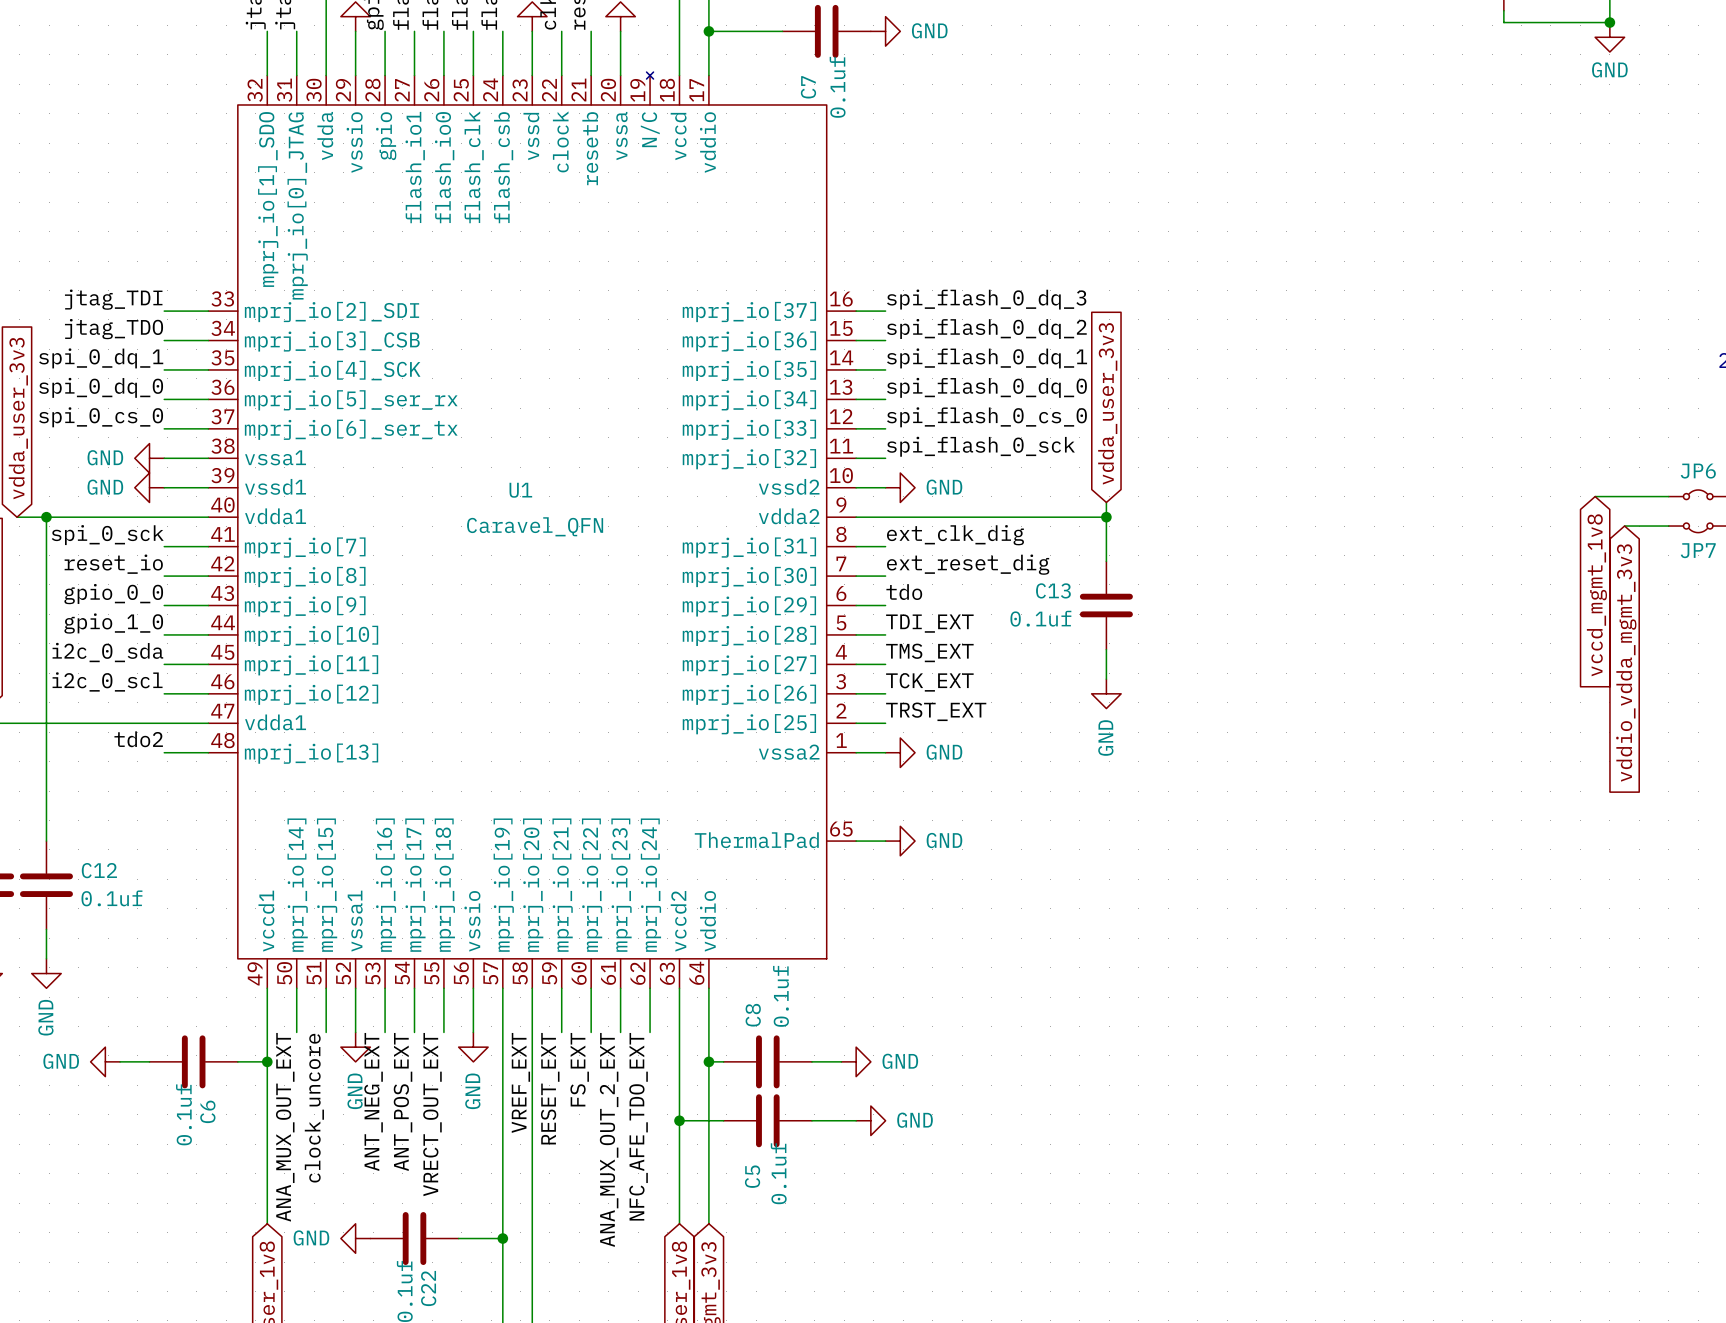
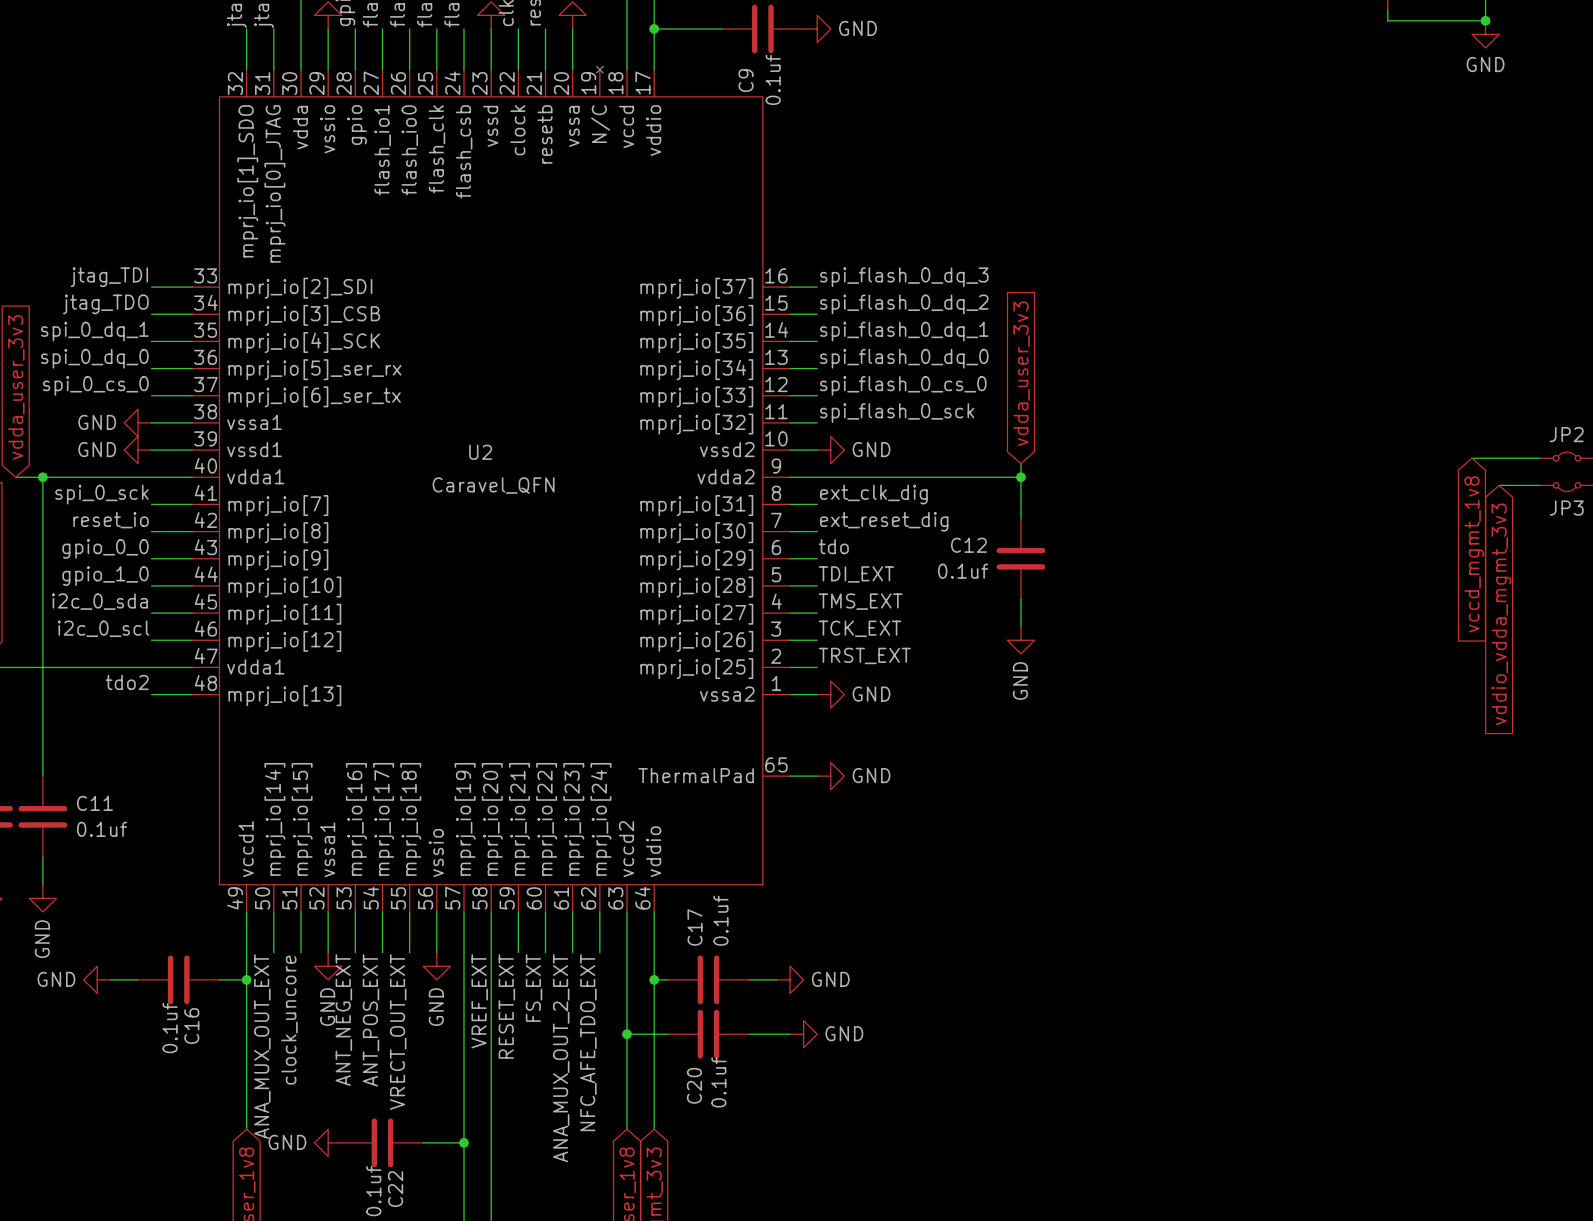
C7 name: C7 (808, 87) -> C9 (746, 80)
JP6 name: JP6 (1698, 471) -> JP2 (1566, 434)
U1 name: U1 (520, 490) -> U2 (480, 452)
JP7 name: JP7 (1698, 550) -> JP3 (1566, 508)
C13 name: C13 (1053, 590) -> C12 (968, 545)
C12 name: C12 (99, 870) -> C11 (94, 803)
C8 name: C8 (753, 1015) -> C17 (695, 927)
C6 name: C6 (207, 1111) -> C16 (191, 1026)
C5 name: C5 (752, 1176) -> C20 (694, 1085)

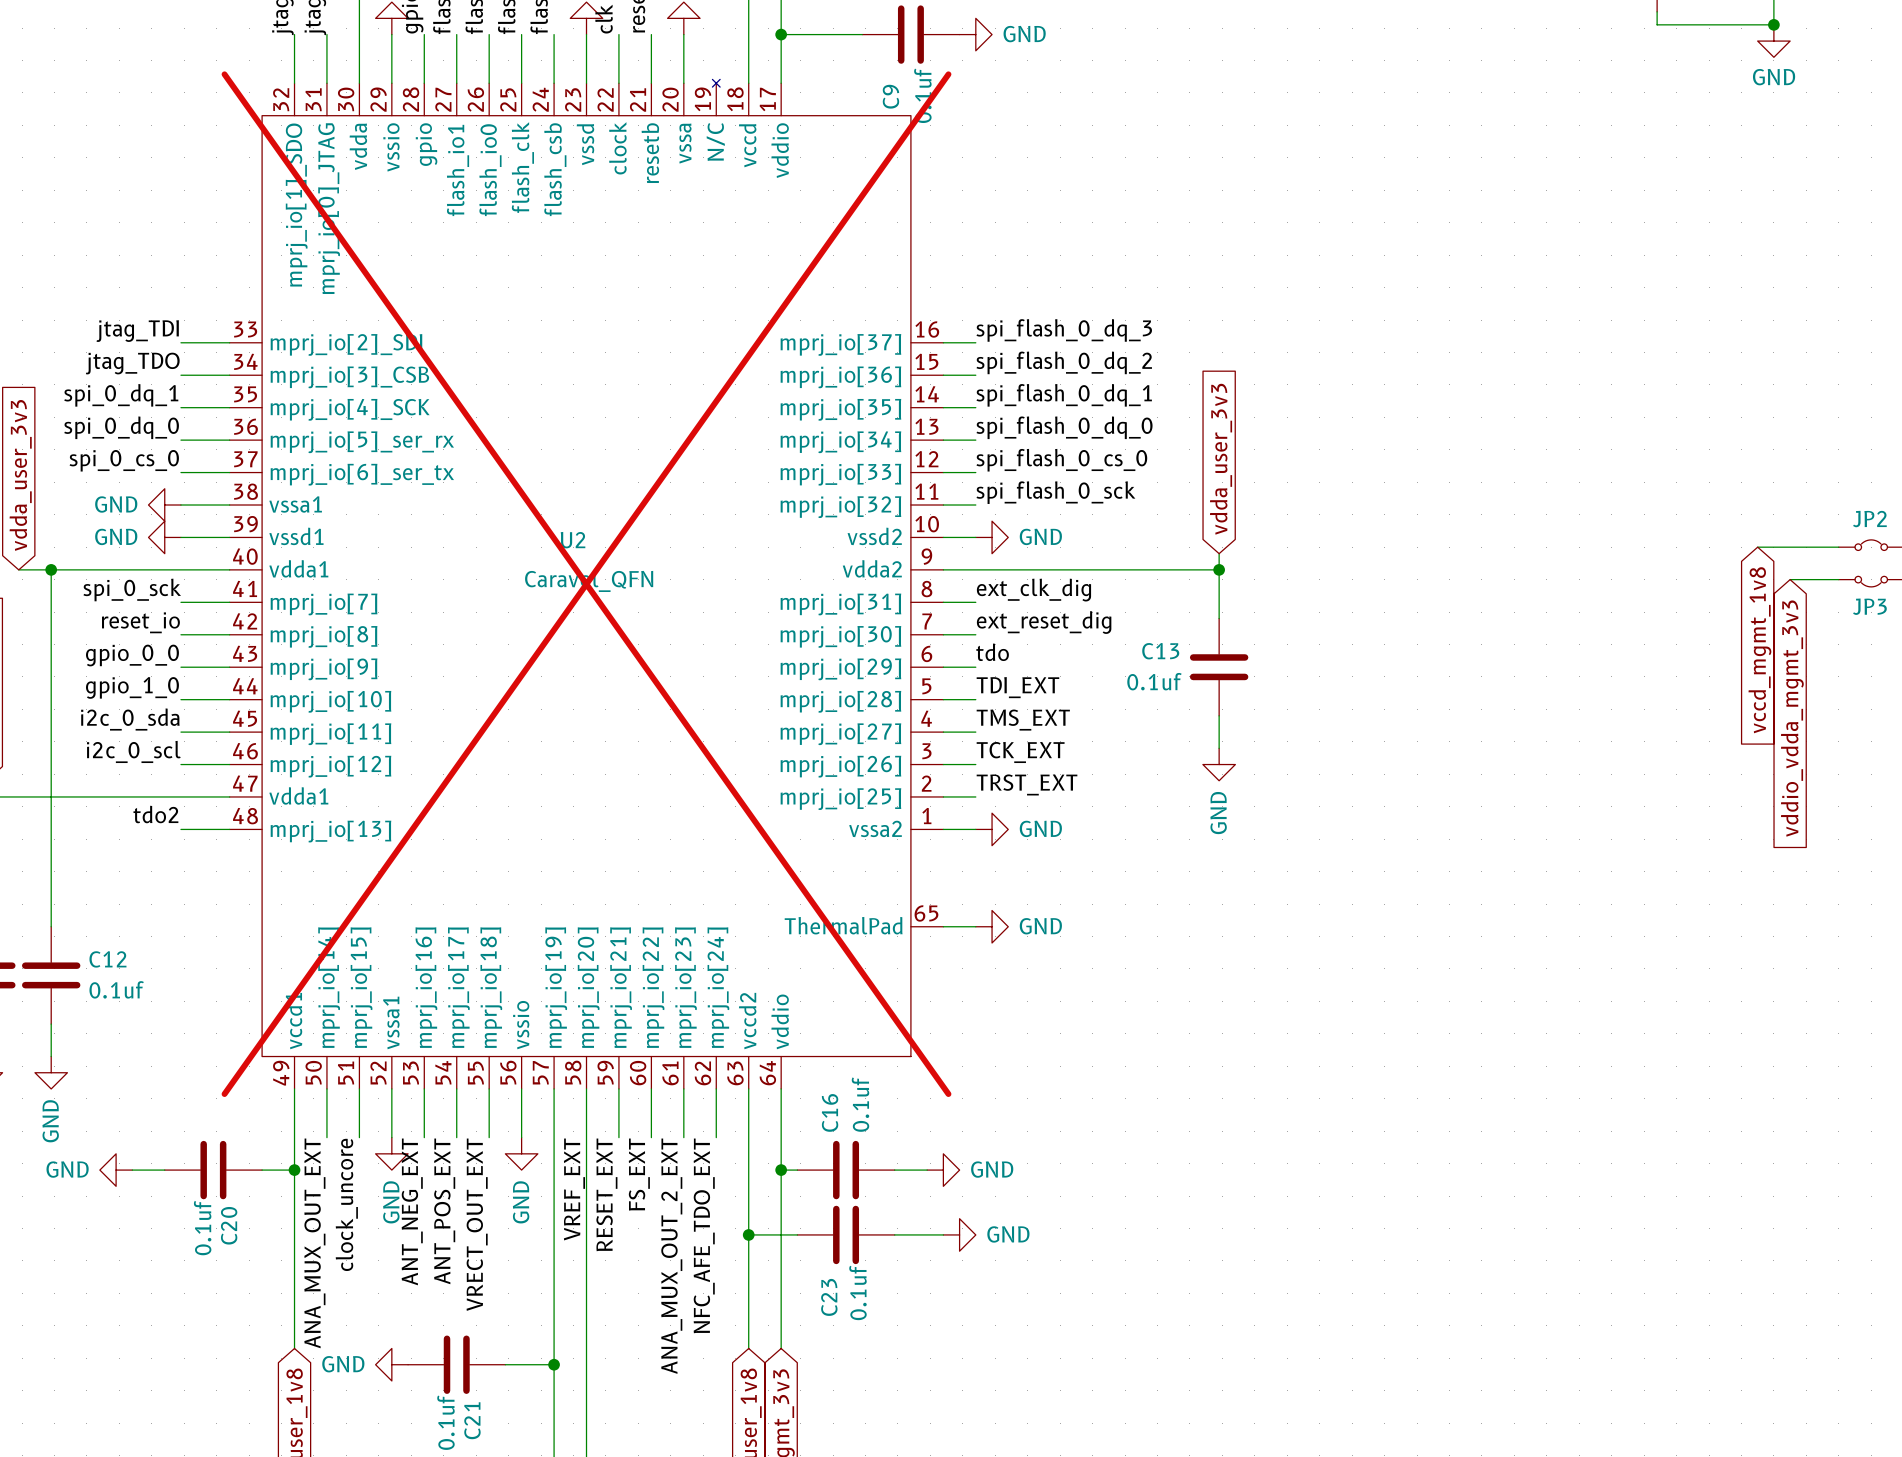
U2 do-not-place cross: none -> (586, 584)
C12 name: C12 (968, 545) -> C13 (1160, 651)
C11 name: C11 (94, 803) -> C12 (107, 959)
C17 name: C17 (695, 927) -> C16 (830, 1112)
C16 name: C16 (191, 1026) -> C20 (229, 1225)
C20 name: C20 (694, 1085) -> C23 (829, 1297)
C22 name: C22 (395, 1189) -> C21 (472, 1420)

